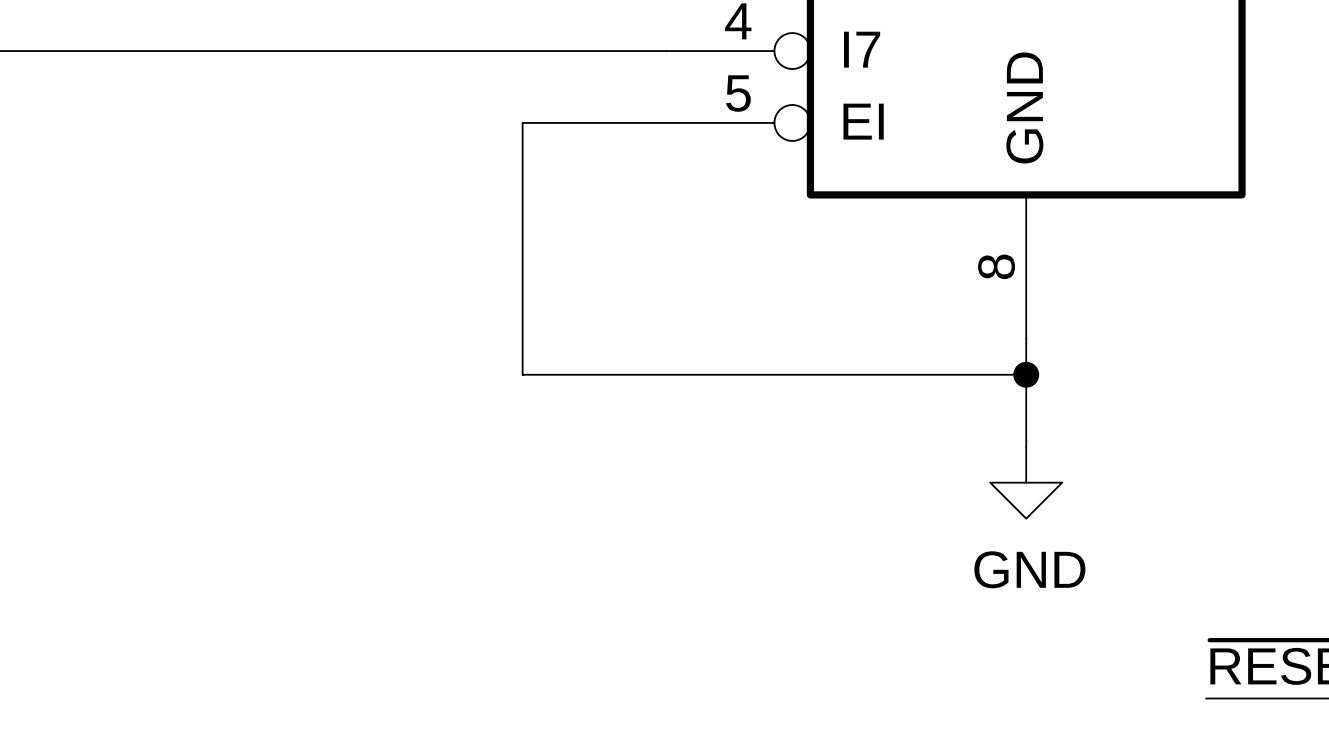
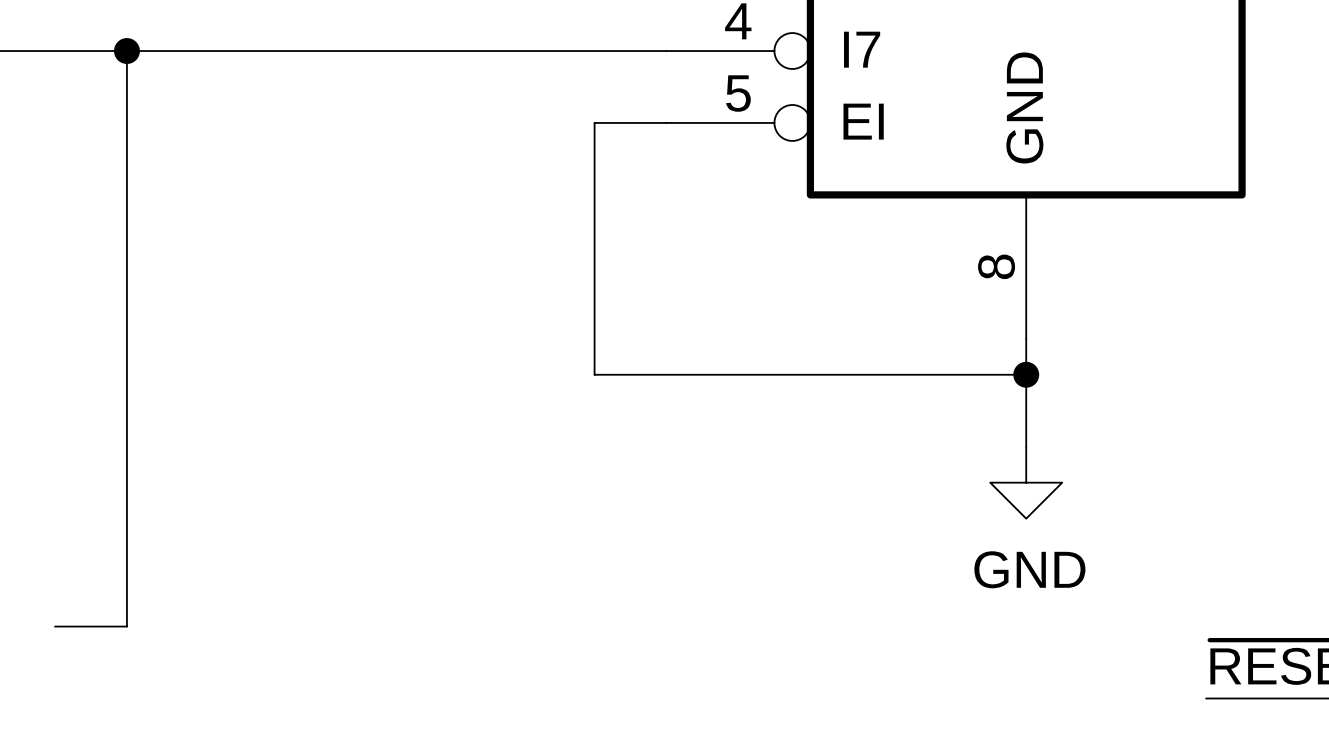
wire: none -> (126, 51) (126, 626) (55, 626)
junction: none -> (126, 51)
wire: (594, 122) (522, 122) (522, 374) (594, 374) -> (594, 122) (594, 374)

